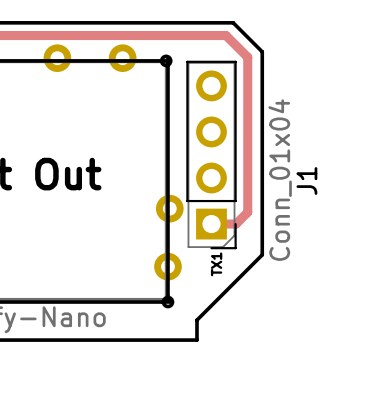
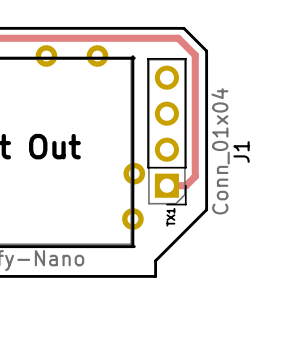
round board edge: [159, 54, 173, 68] -> none
round board edge: [161, 295, 175, 309] -> none

